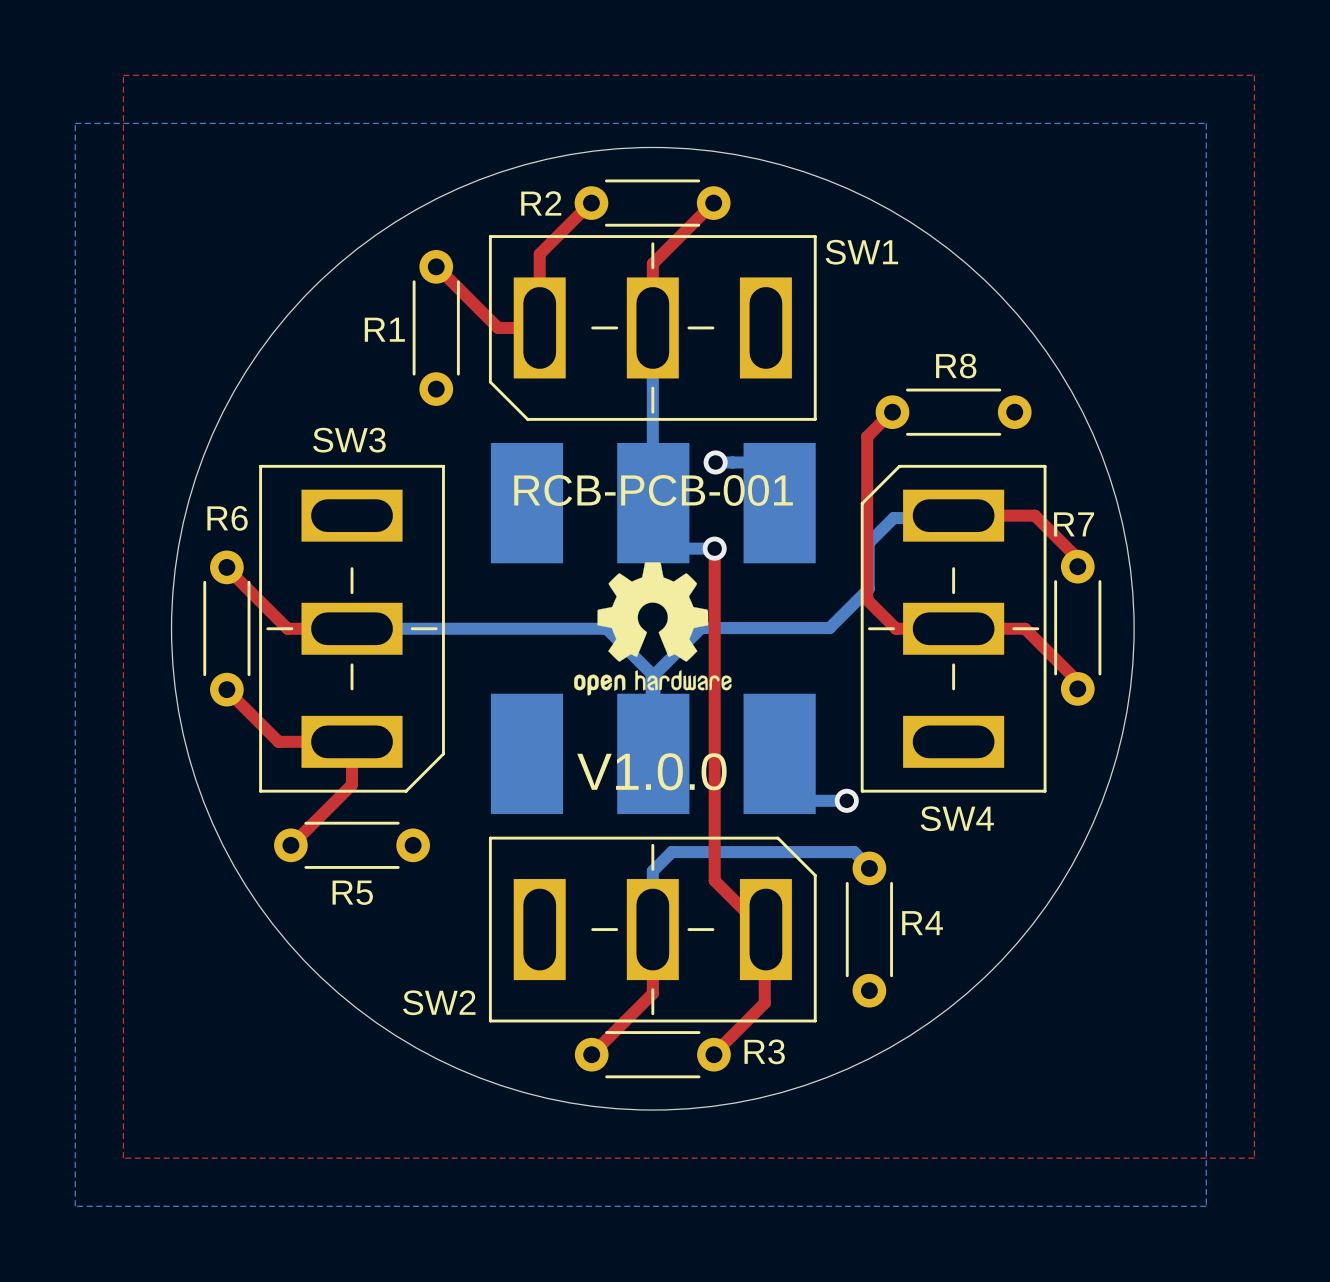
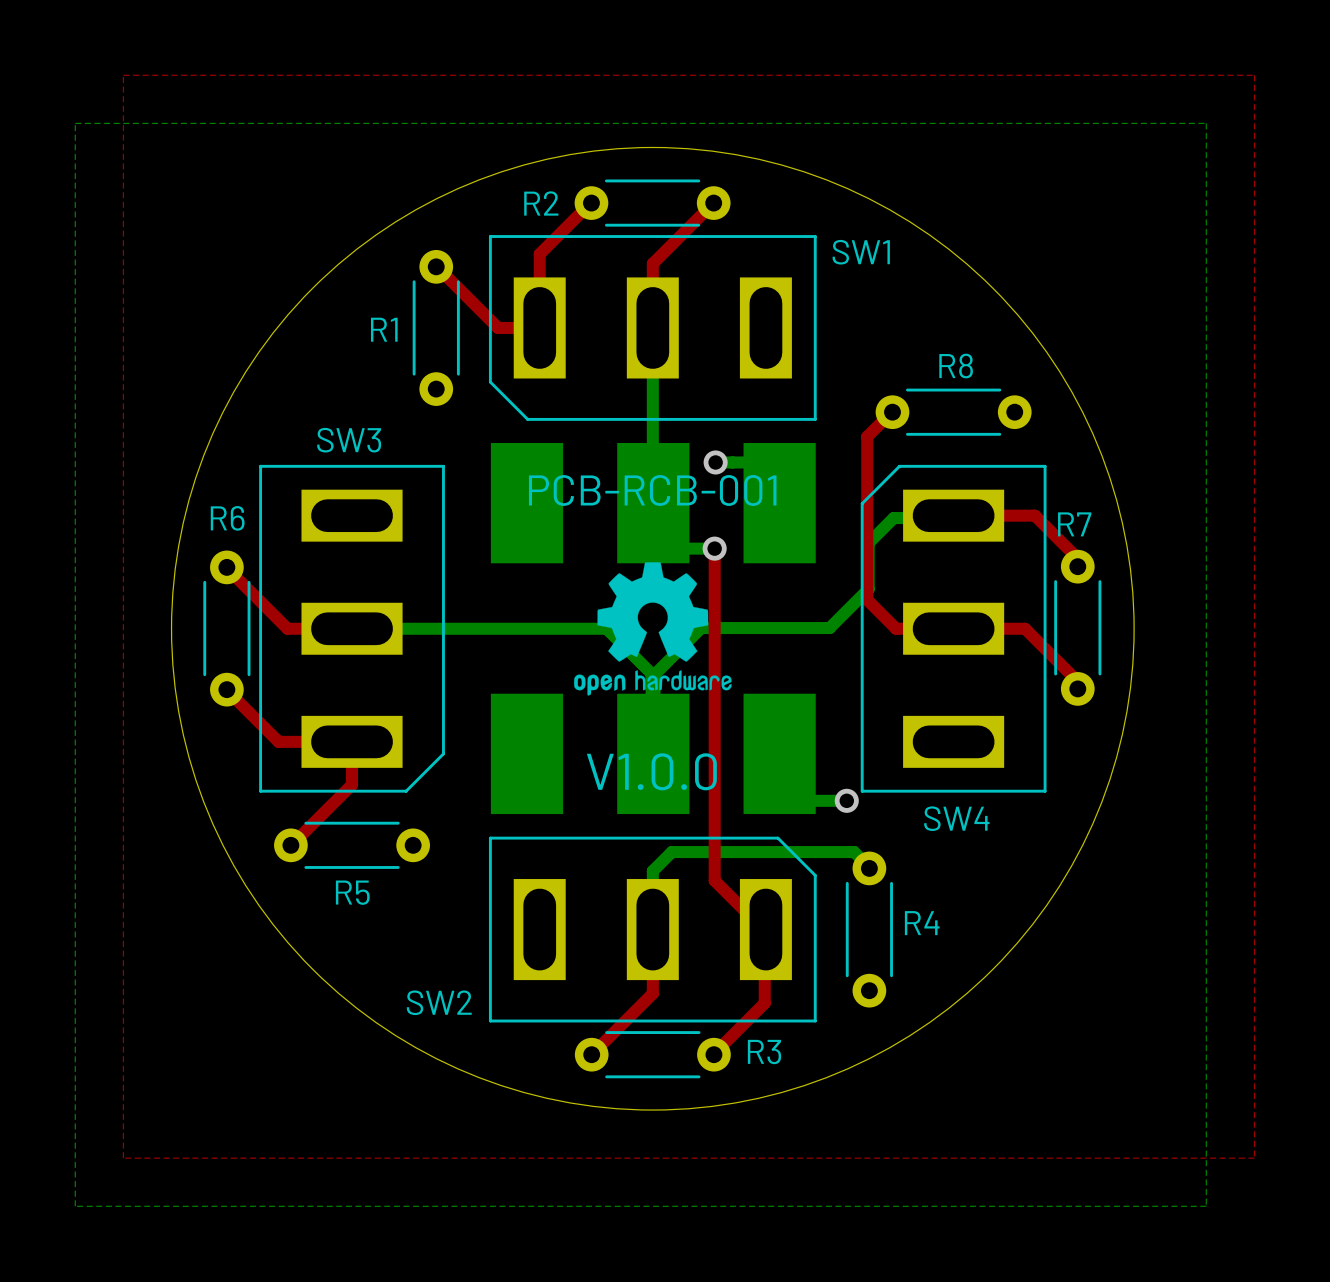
SW1 footprint: [488, 235, 817, 421] -> [488, 235, 817, 421]
SW3 footprint: [259, 464, 445, 793] -> [259, 464, 445, 793]
SW4 footprint: [860, 464, 1047, 793] -> [860, 464, 1047, 793]
text: RCB-PCB-001 (653, 490) -> PCB-RCB-001 (652, 490)
SW2 footprint: [488, 836, 817, 1023] -> [488, 836, 817, 1023]

